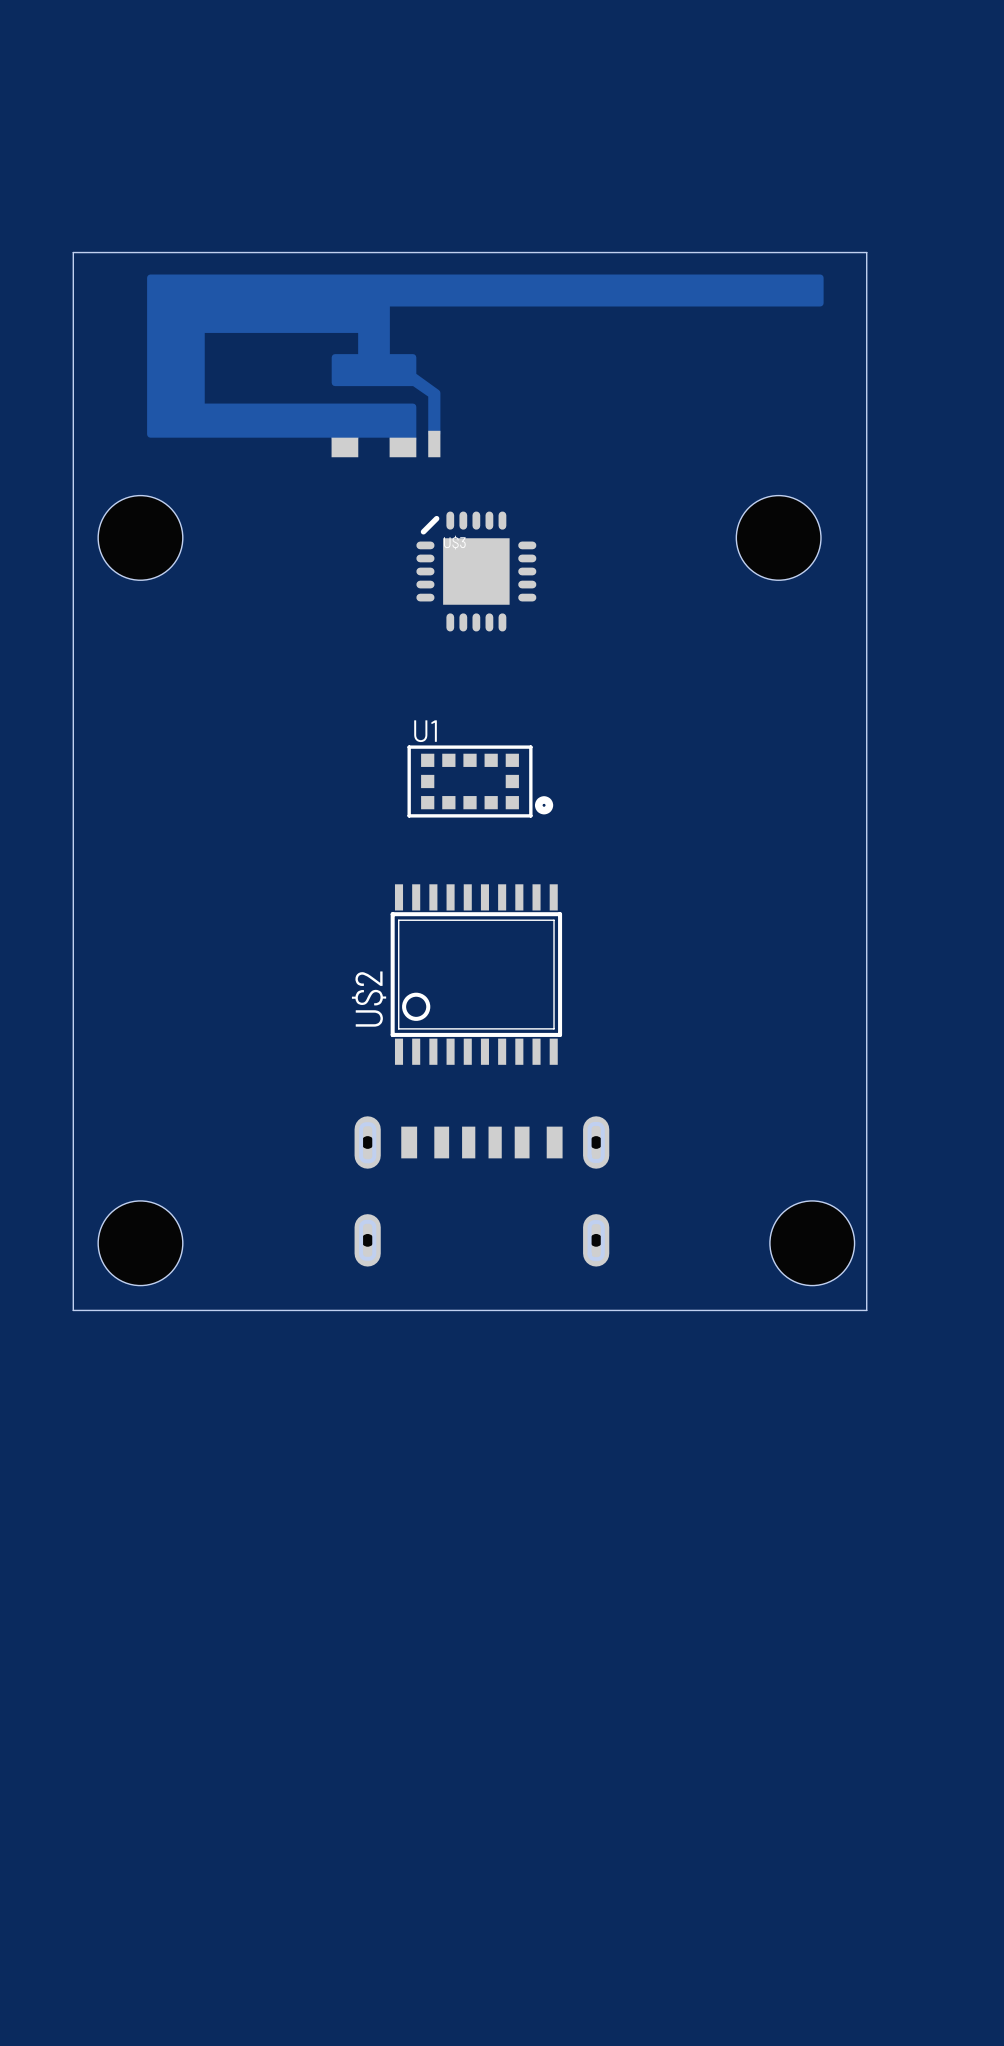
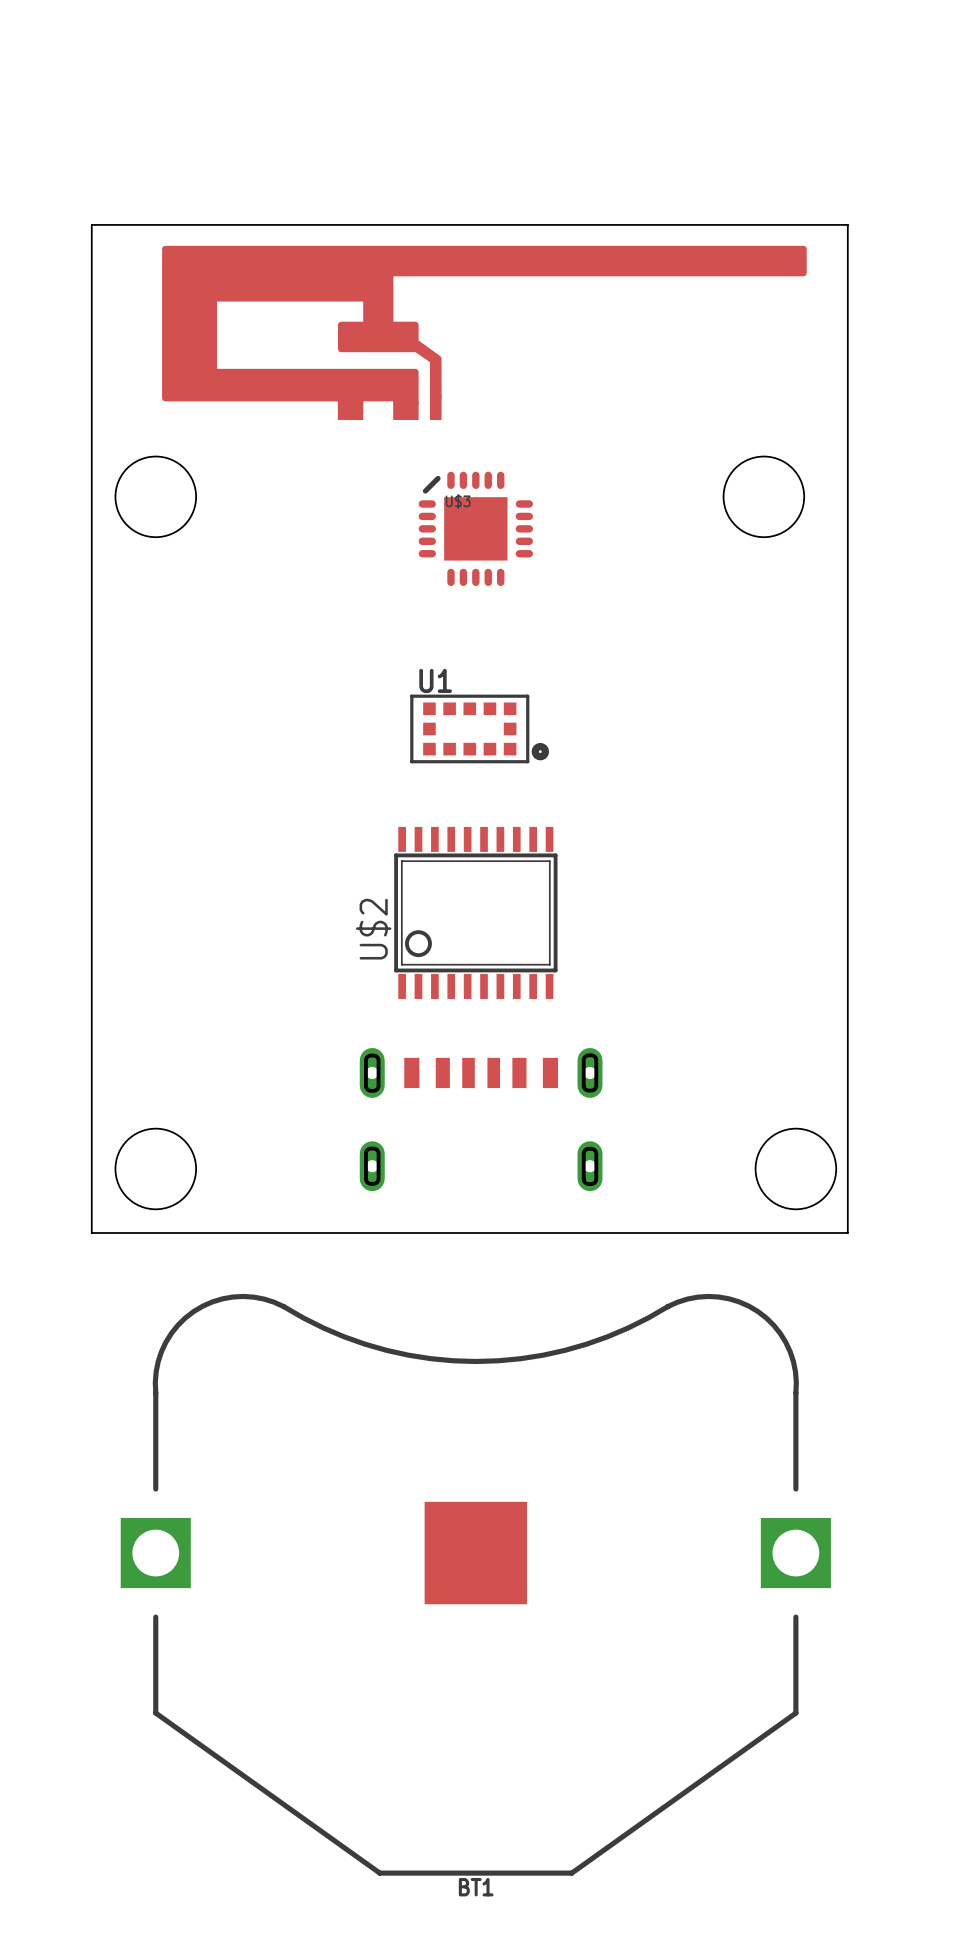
BT1: none -> (475, 1584)

